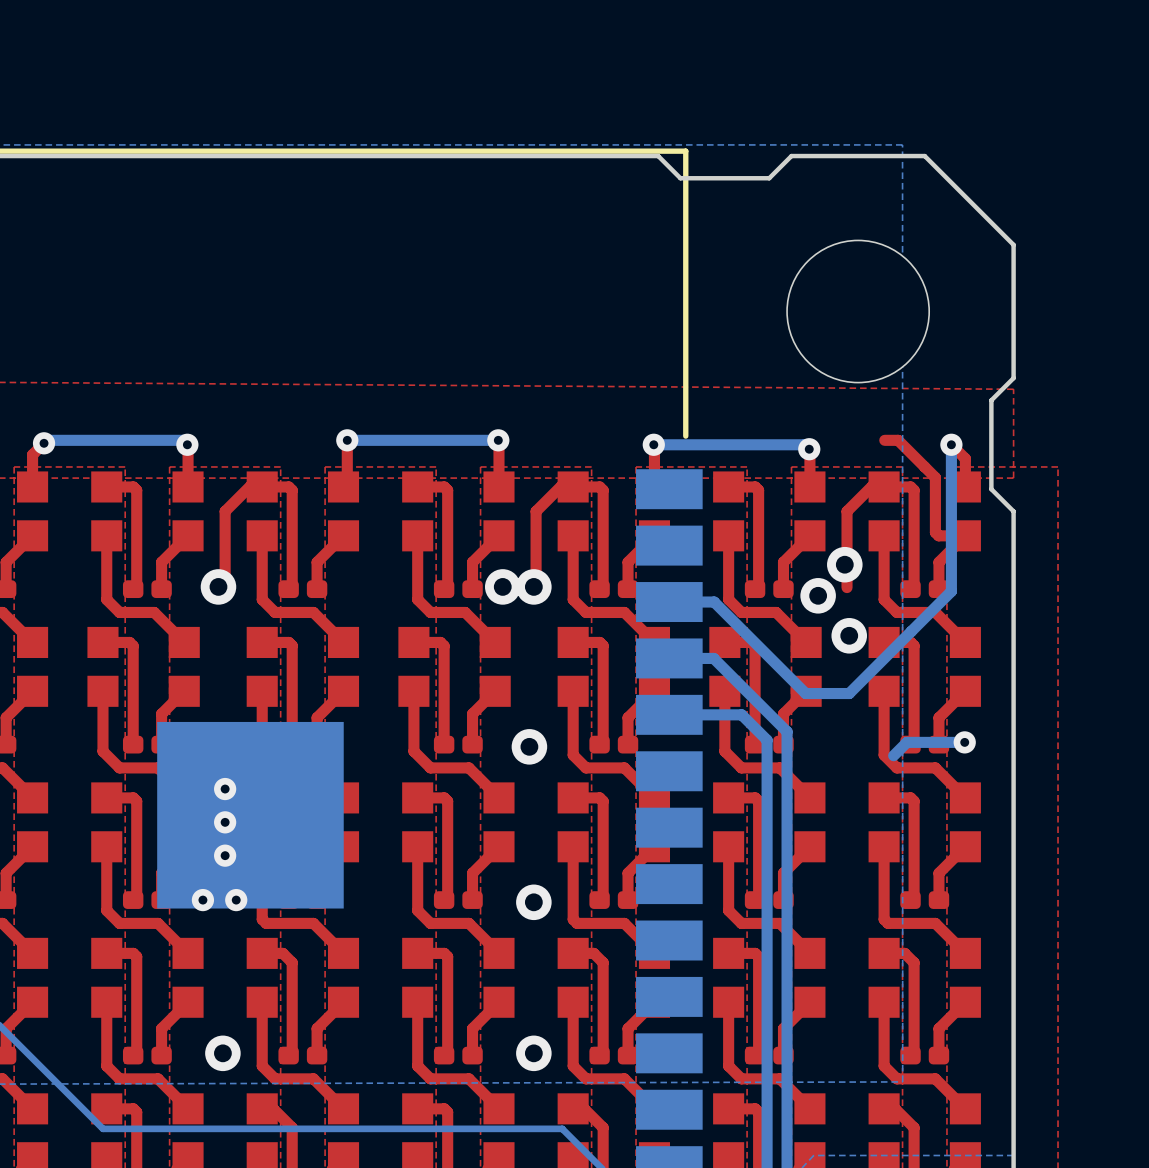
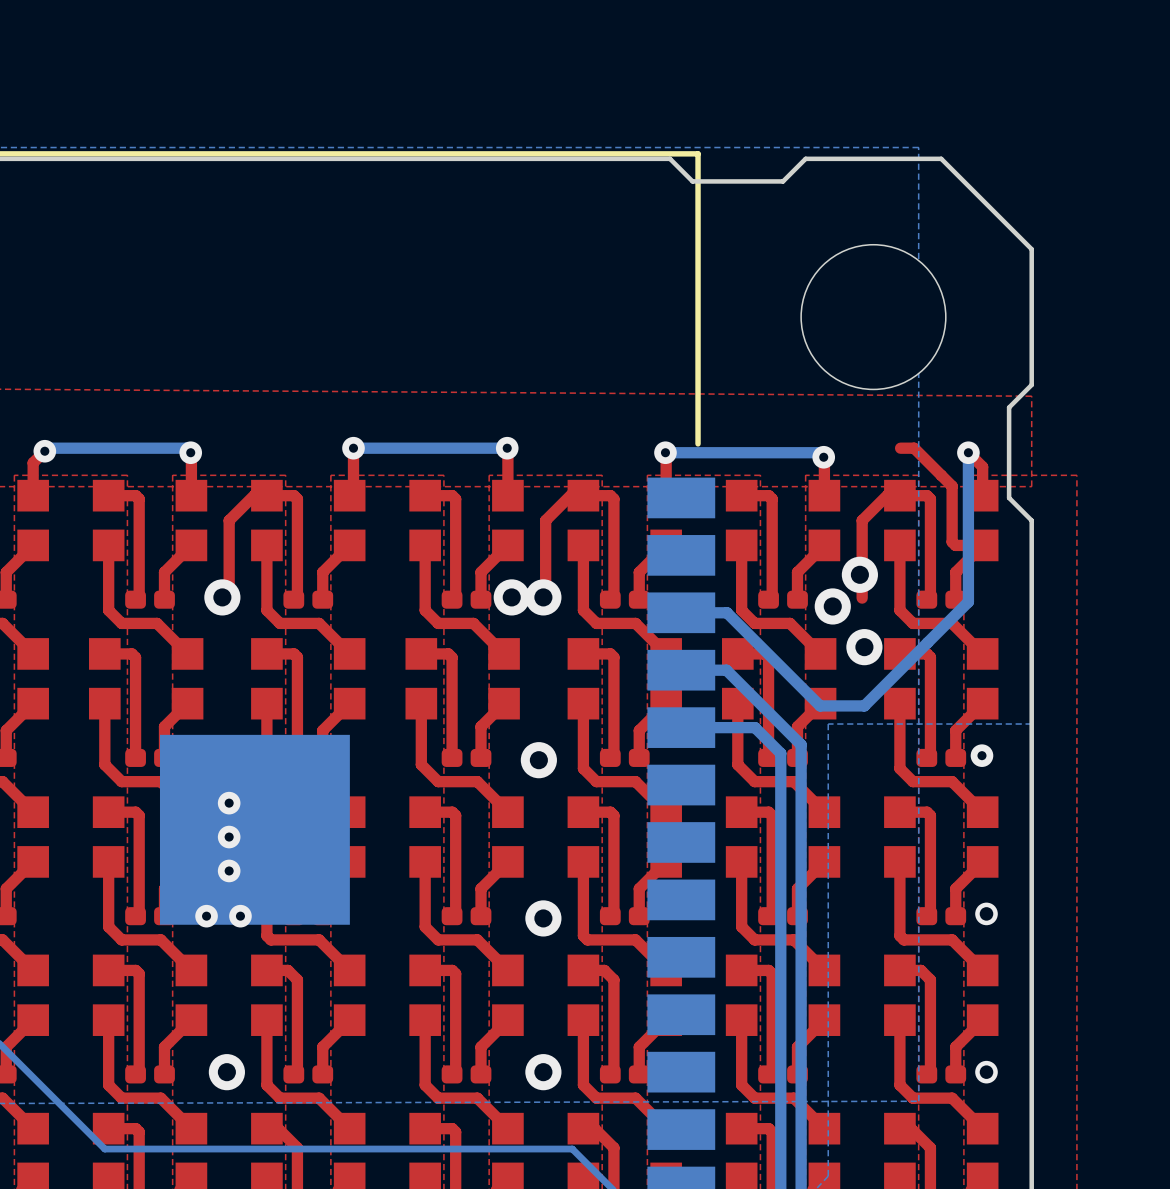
bottom track: (964, 742) (906, 742) (893, 755) -> none
via: none -> (986, 913)
via: none -> (986, 1072)
bottom zone outline: (1013, 1155) (813, 1155) -> (1031, 1176) (1031, 724) (828, 724) (828, 1176)

